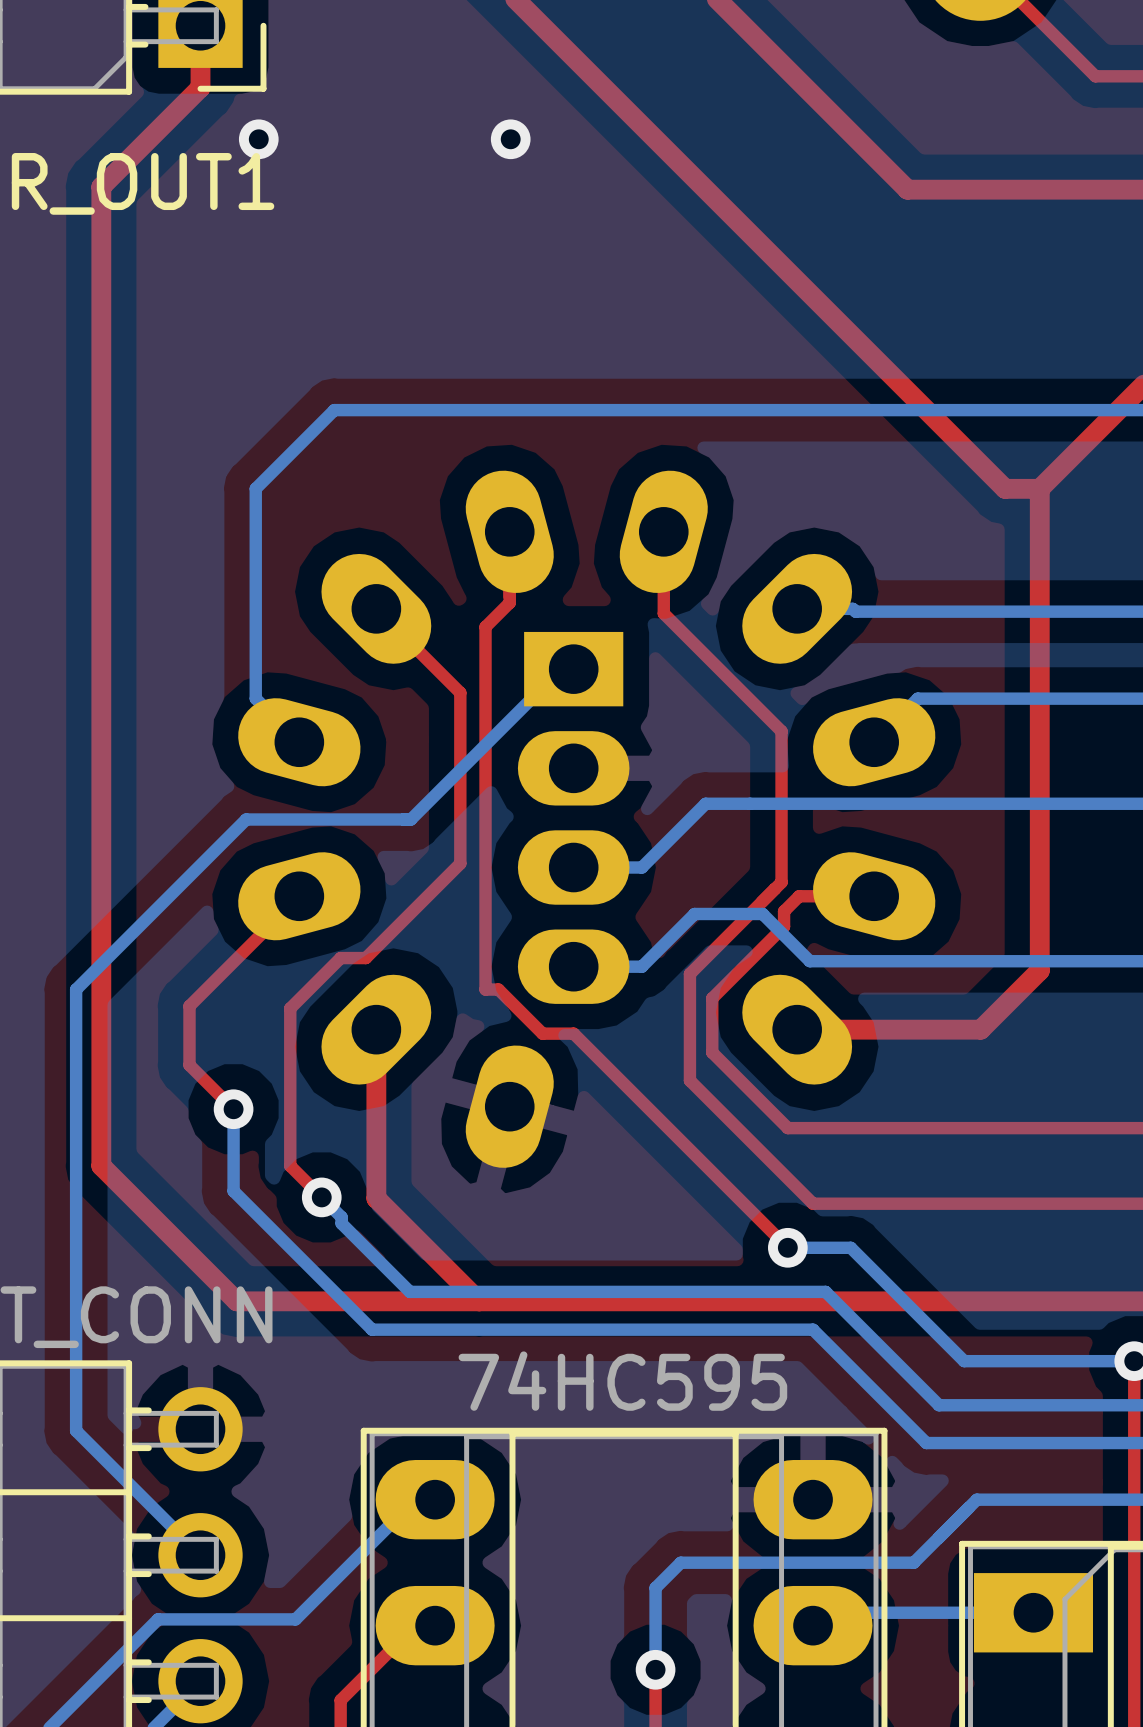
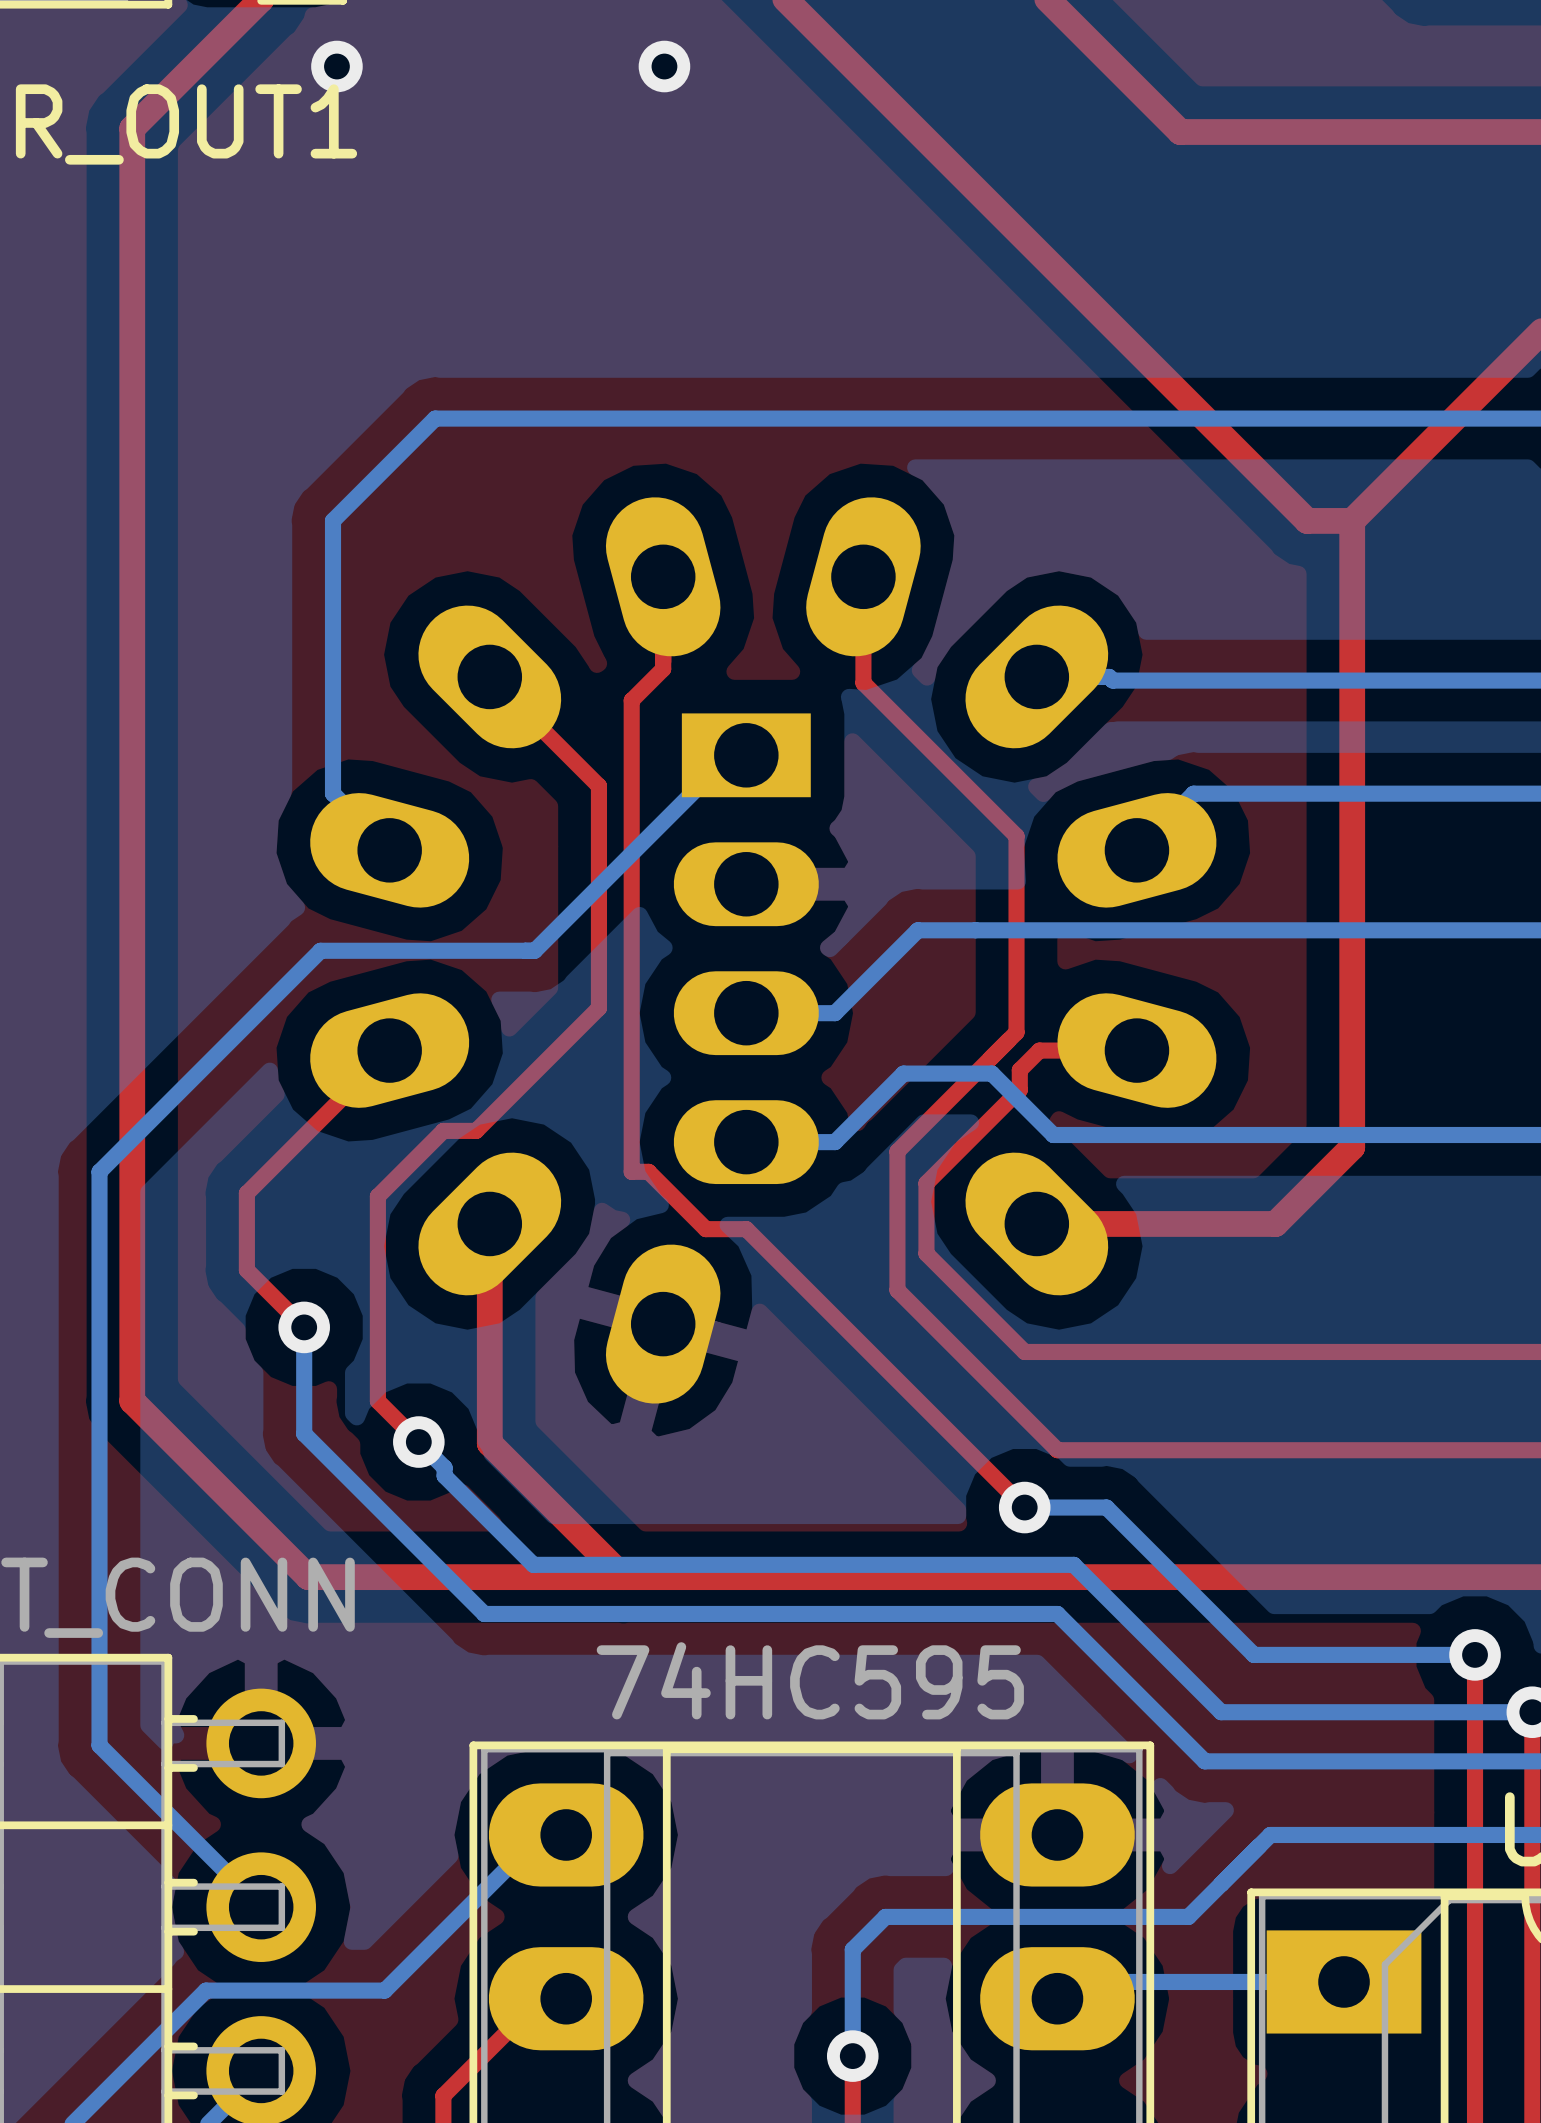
part footprint: [517, 631, 630, 1004] -> [673, 713, 819, 1185]

